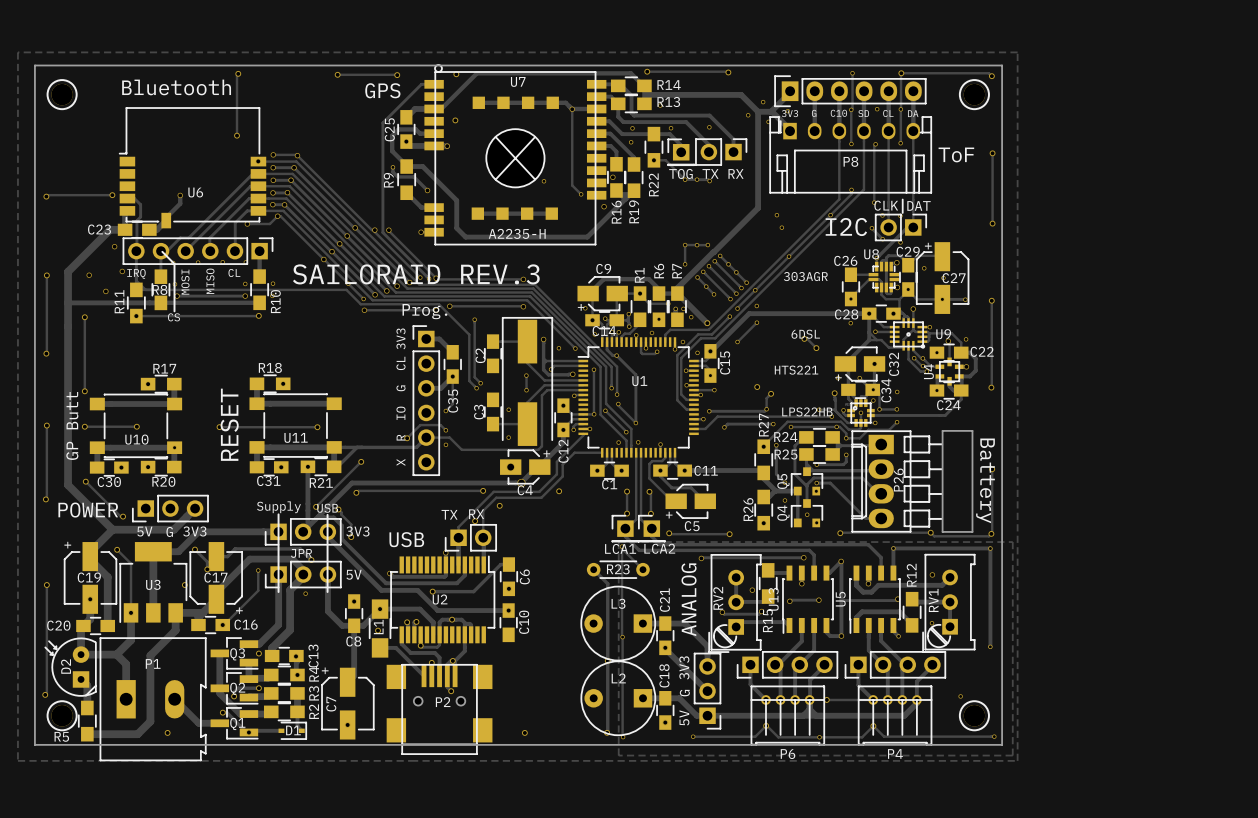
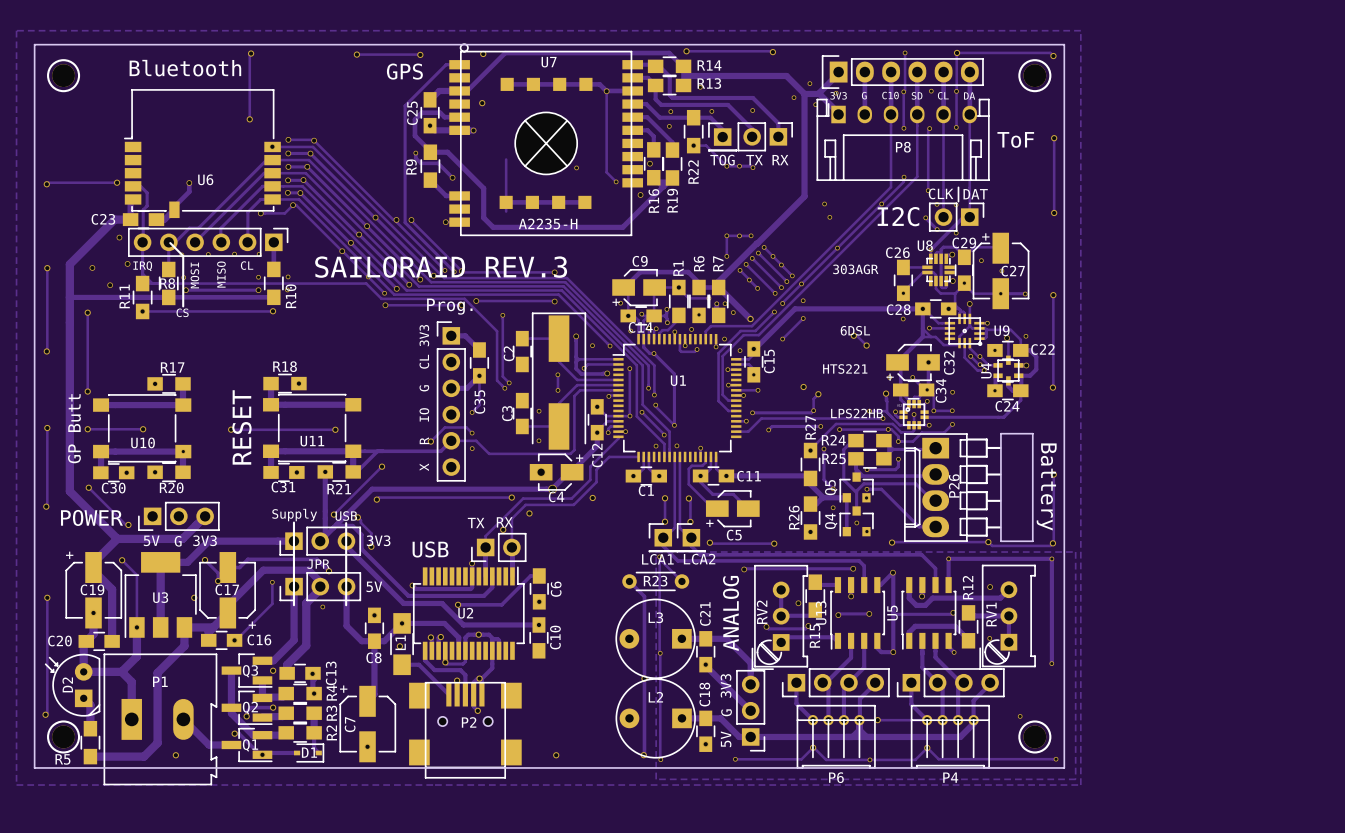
track: none -> (506, 159) (506, 211)

